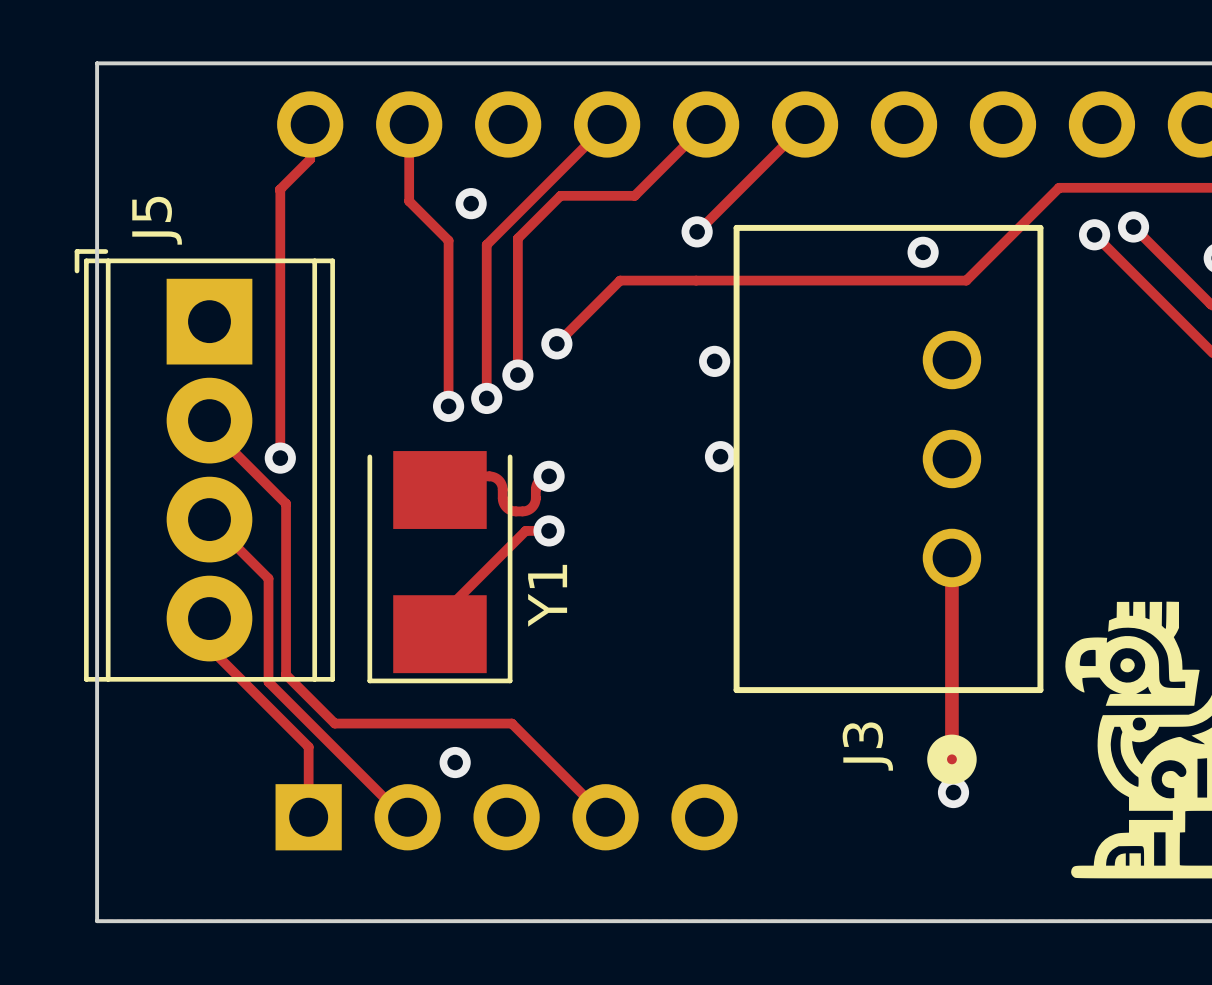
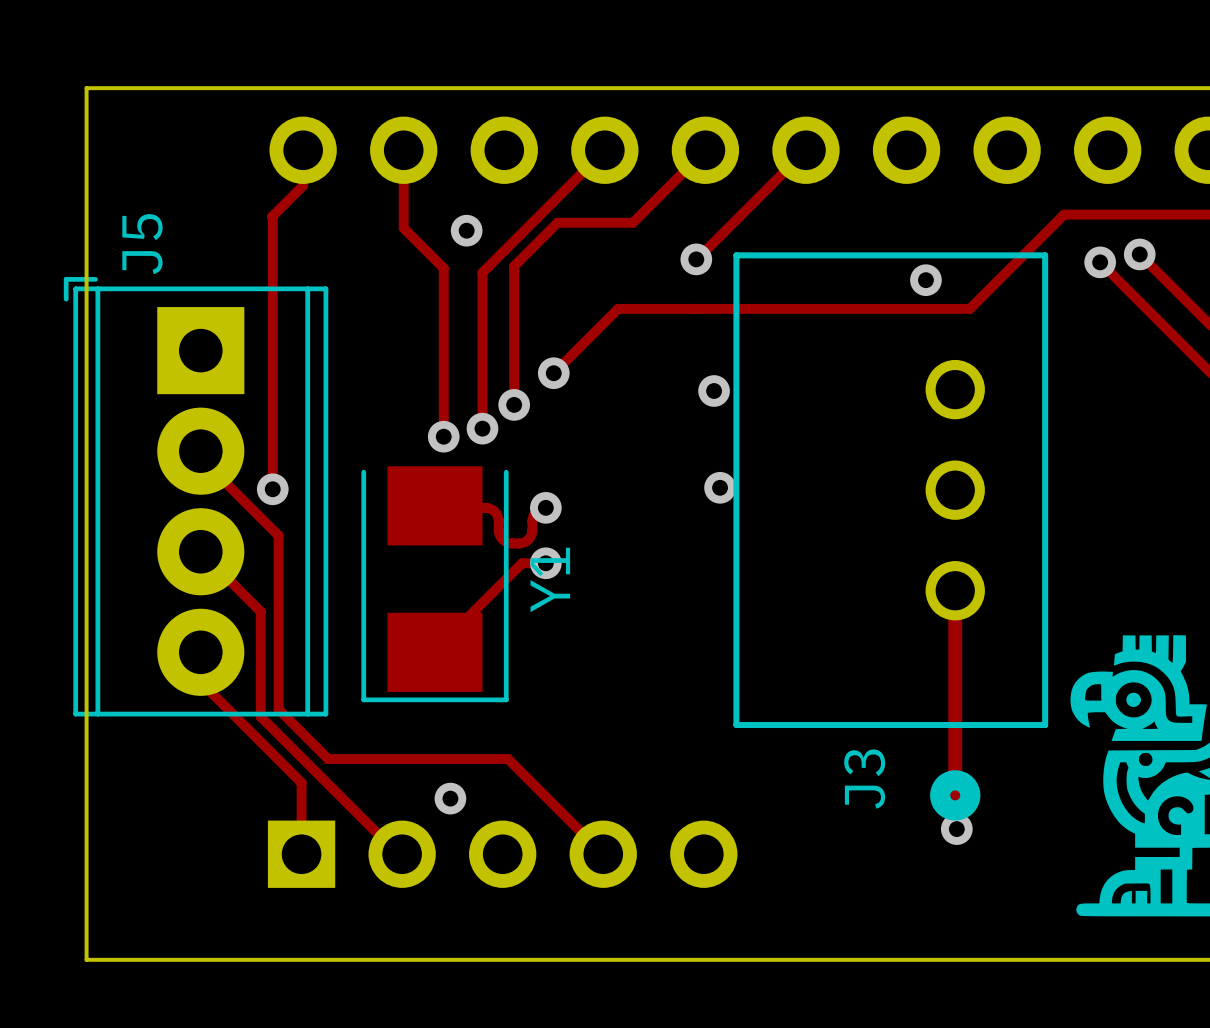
Y1 position: (439, 567) -> (434, 584)
Y1 name position: Y1 (547, 595) -> Y1 (550, 579)

